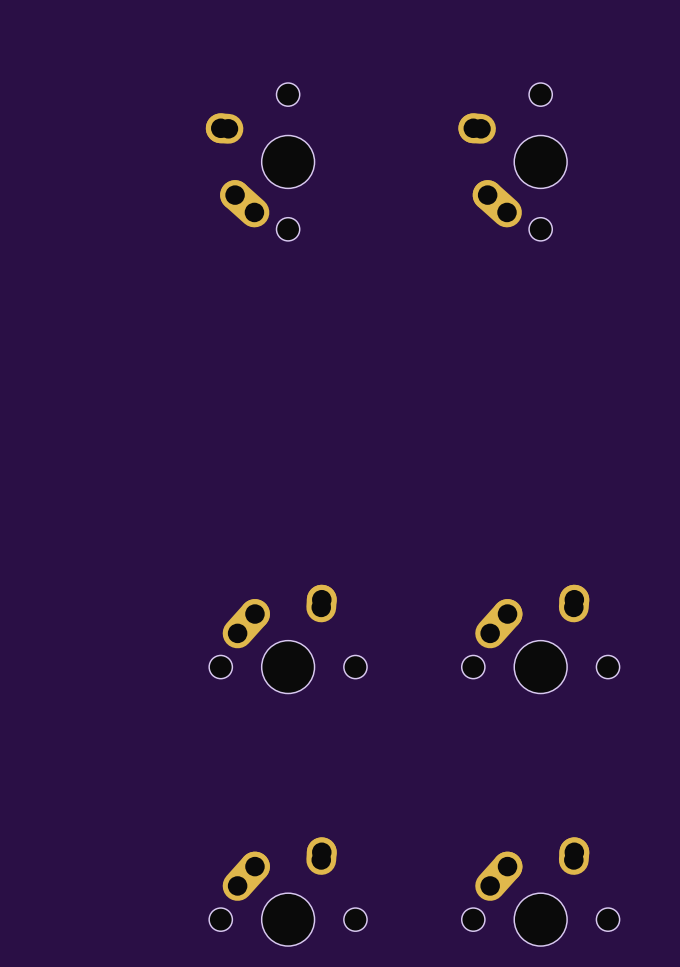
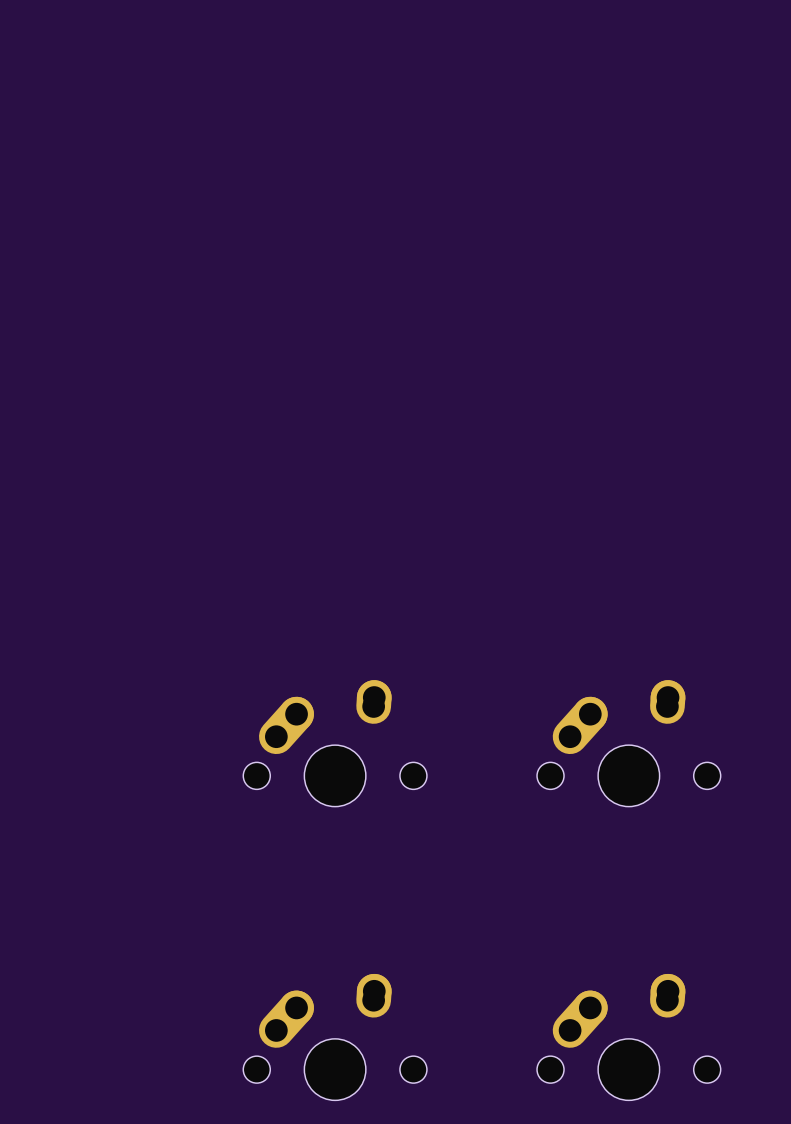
part: (260, 161) -> none
part: (512, 161) -> none

